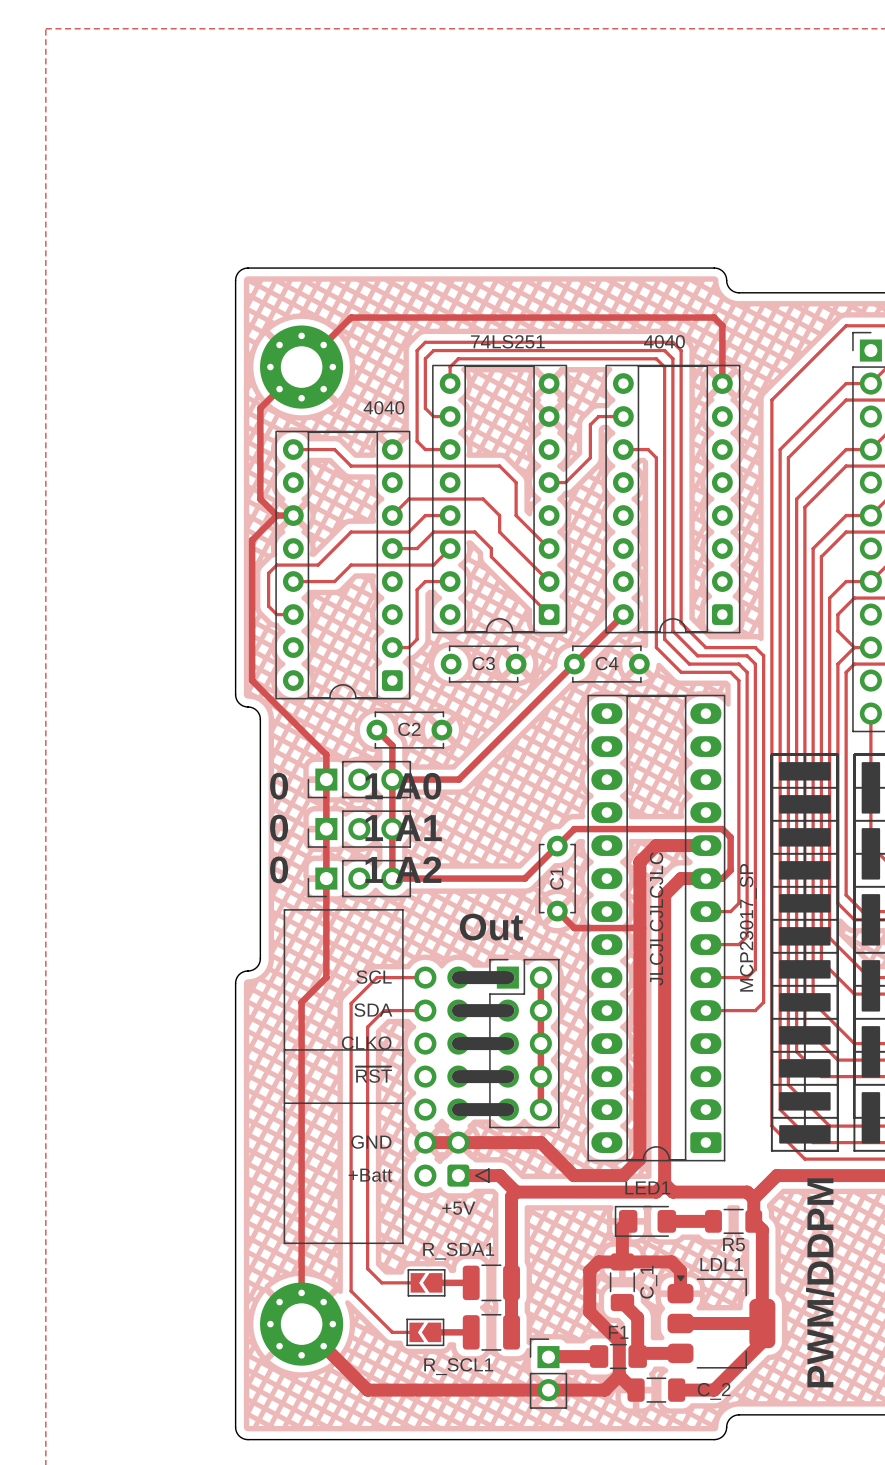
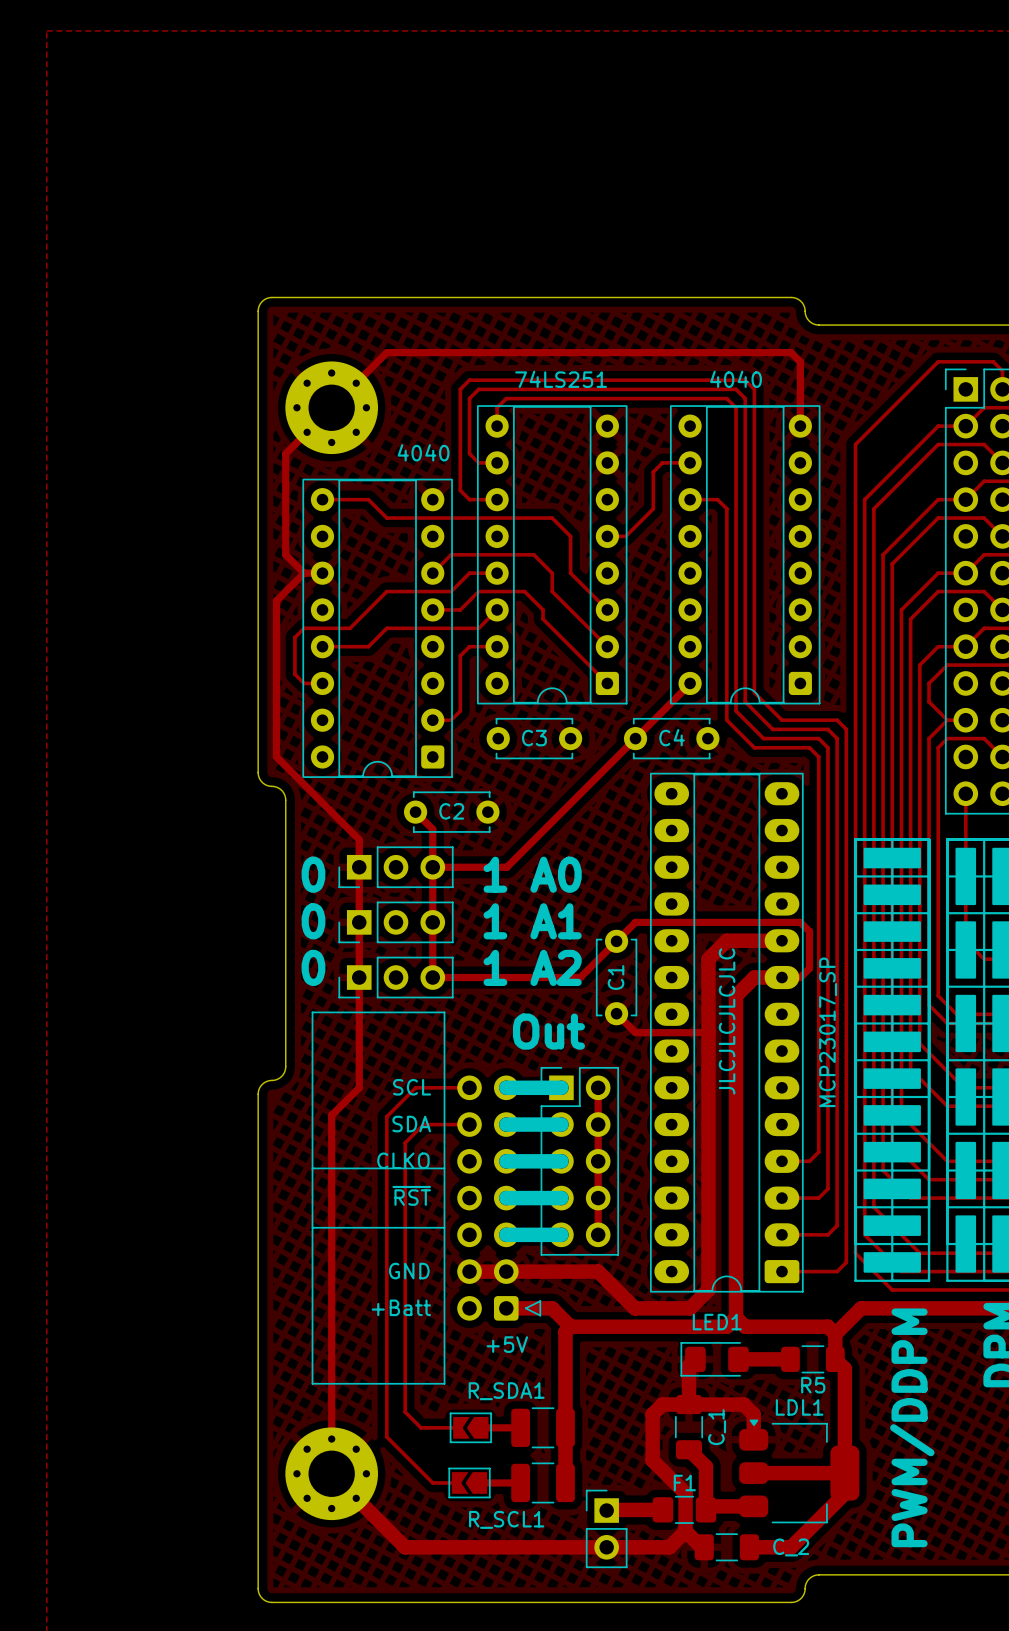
track: (738, 903) (730, 911) (705, 911) -> (818, 1005) (818, 1152) (809, 1161) (781, 1161)
track: (747, 936) (738, 944) (705, 944) -> (827, 1041) (827, 1188) (818, 1198) (781, 1198)
track: (755, 969) (747, 977) (705, 977) -> (837, 1078) (837, 1225) (827, 1234) (781, 1234)
track: (763, 1002) (755, 1010) (705, 1010) -> (846, 1115) (846, 1262) (837, 1271) (781, 1271)

